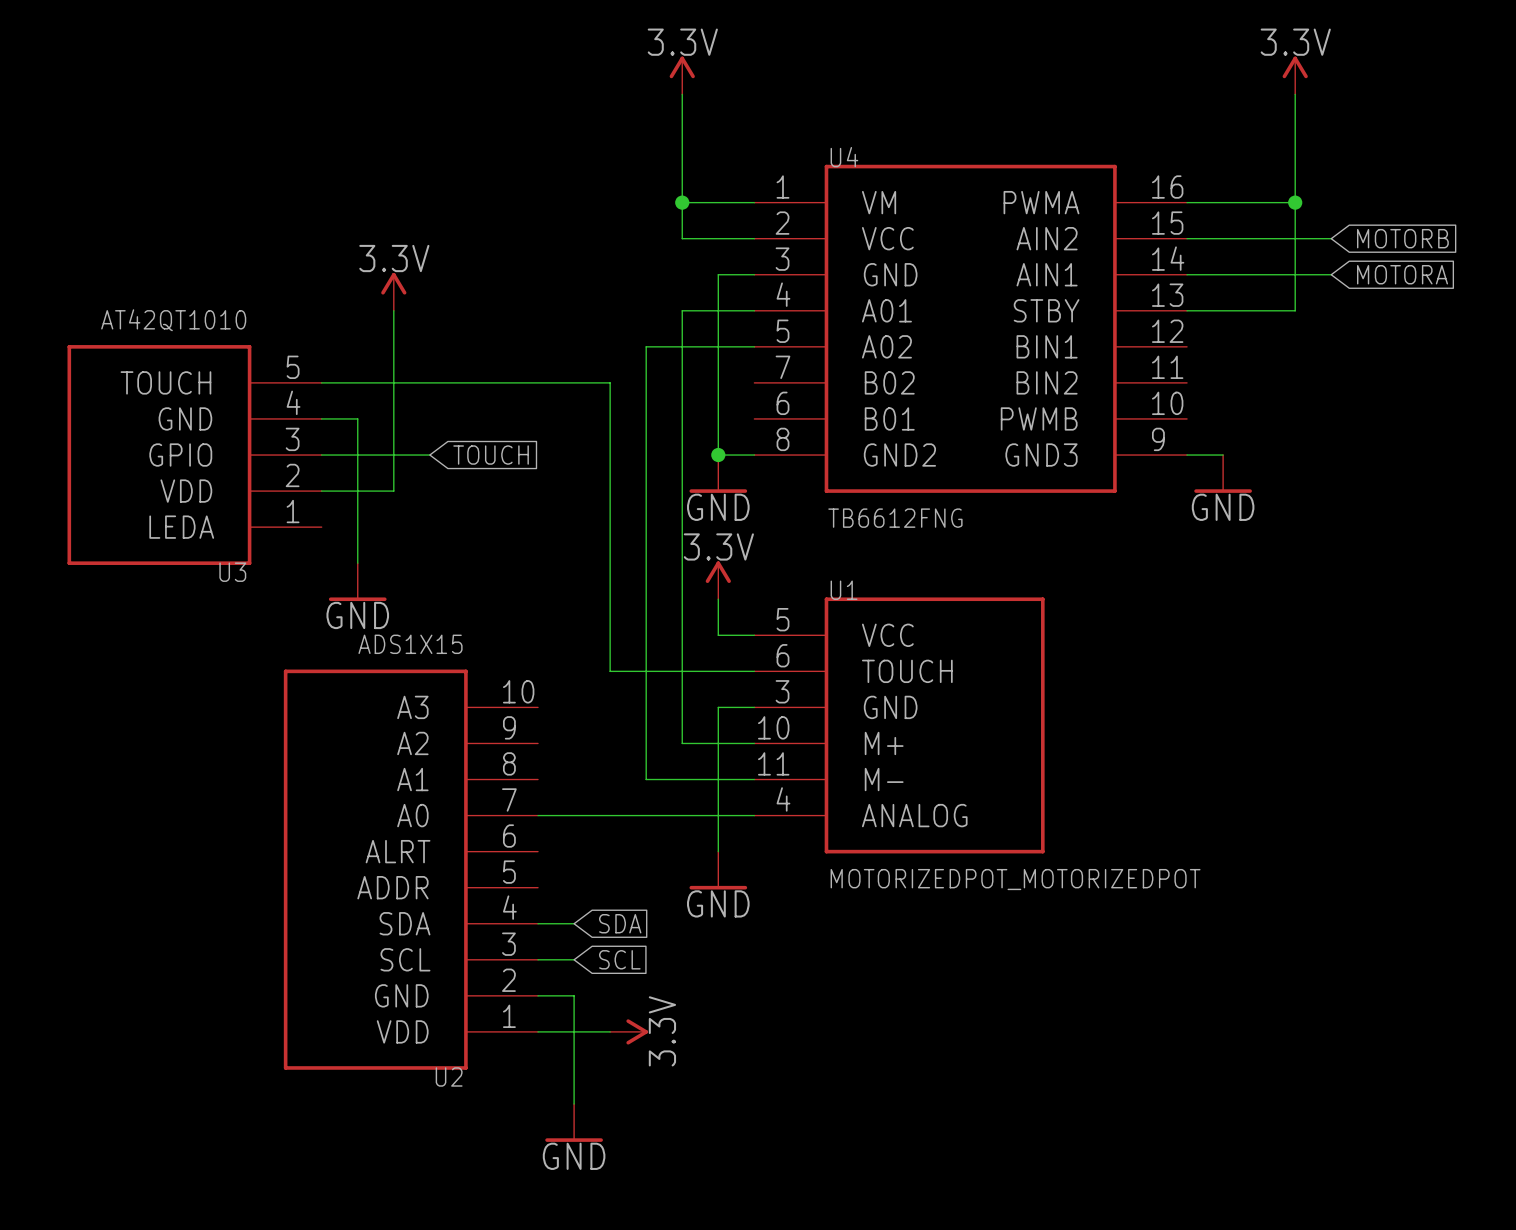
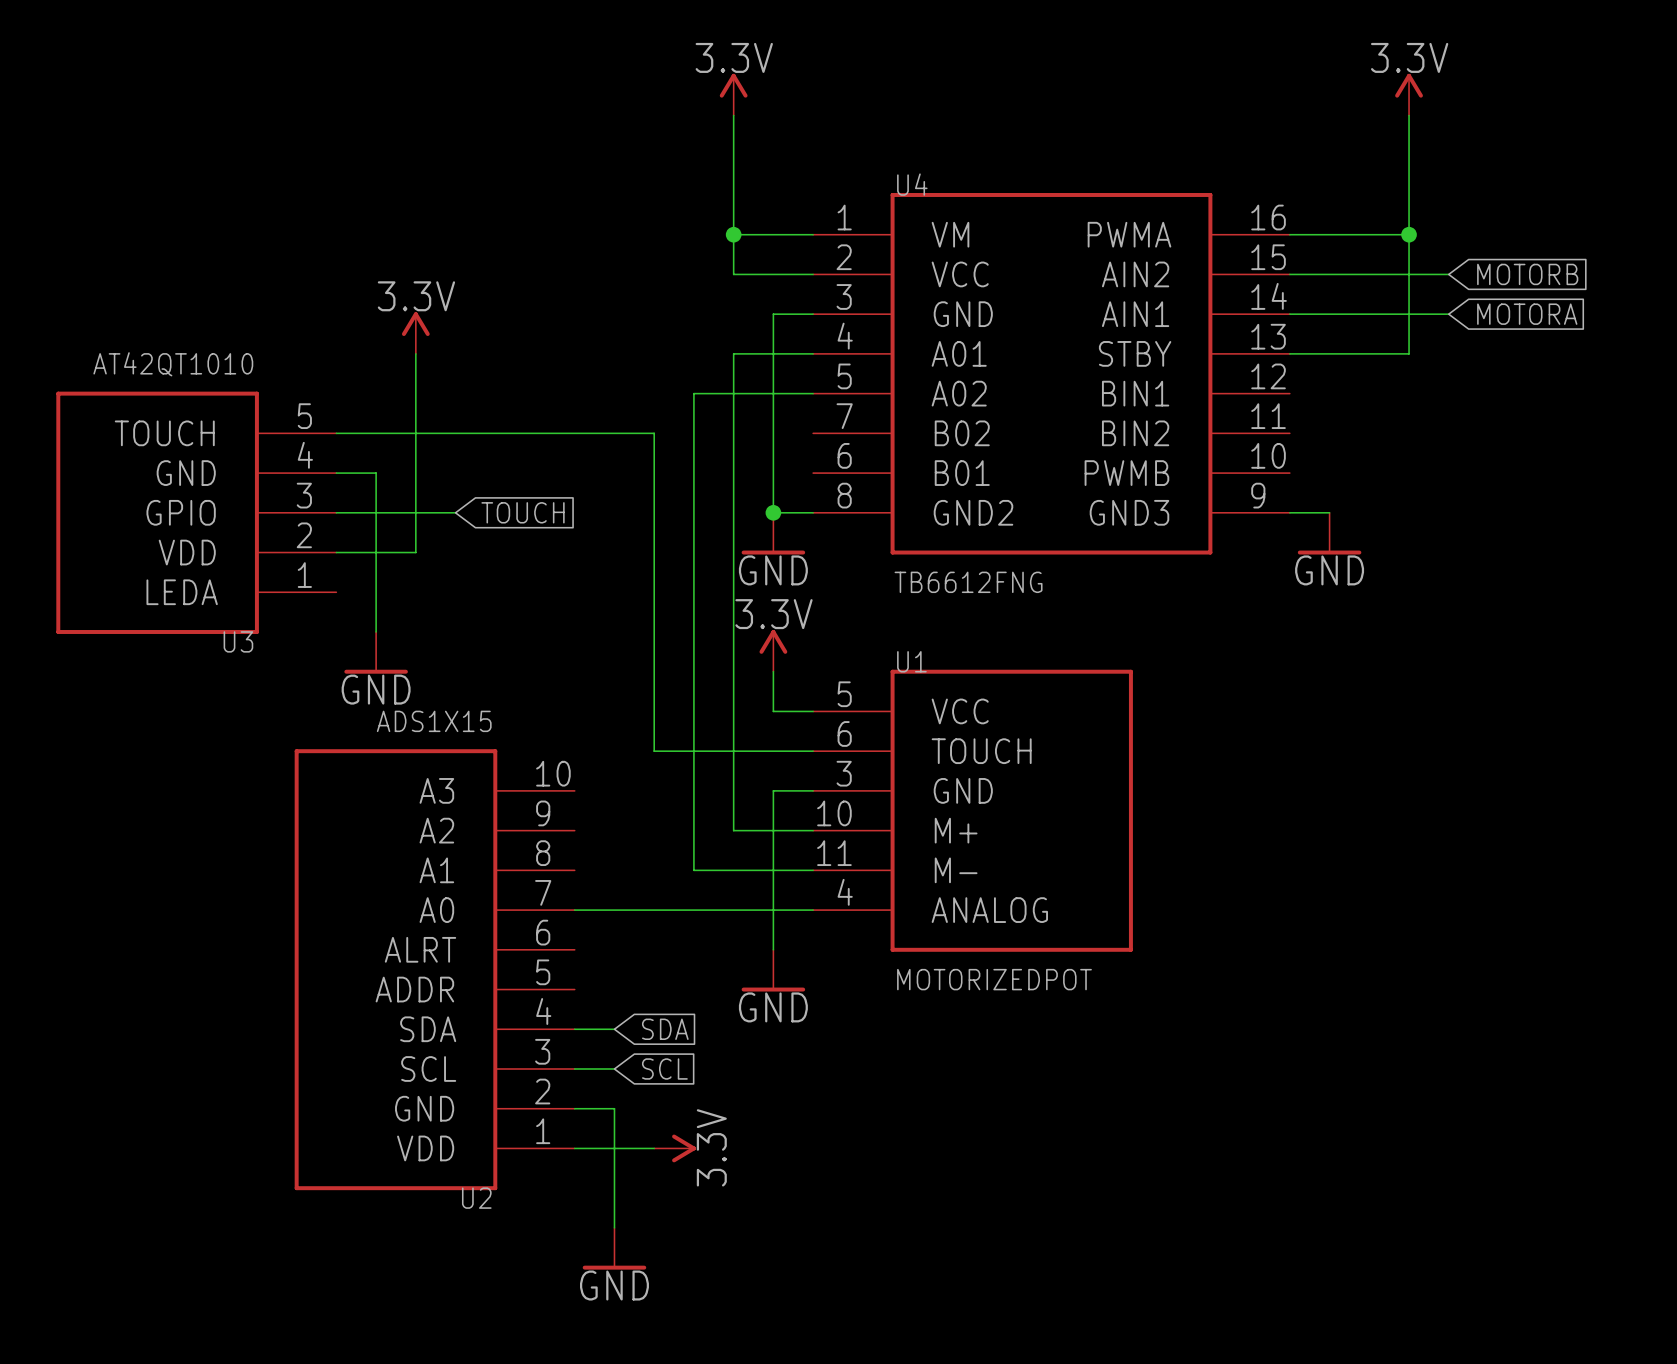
U1 value: MOTORIZEDPOT_MOTORIZEDPOT (1015, 879) -> MOTORIZEDPOT (994, 979)

